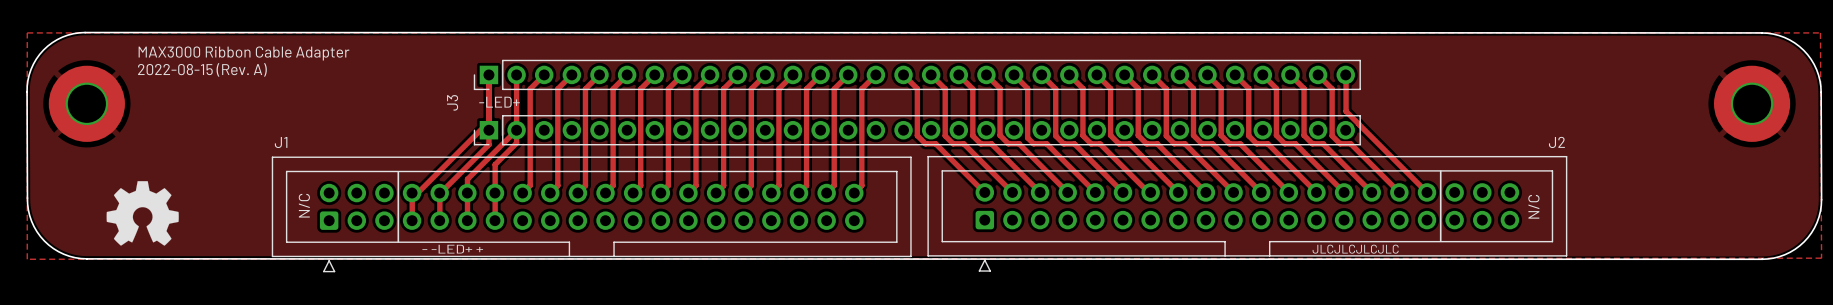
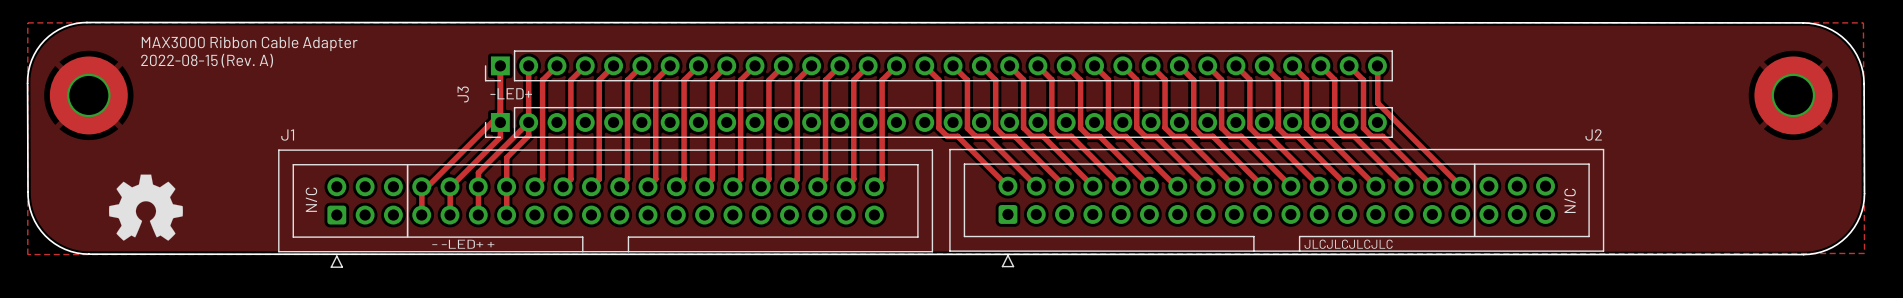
JLCJLCJLCJLC position: (1355, 249) -> (1348, 244)

